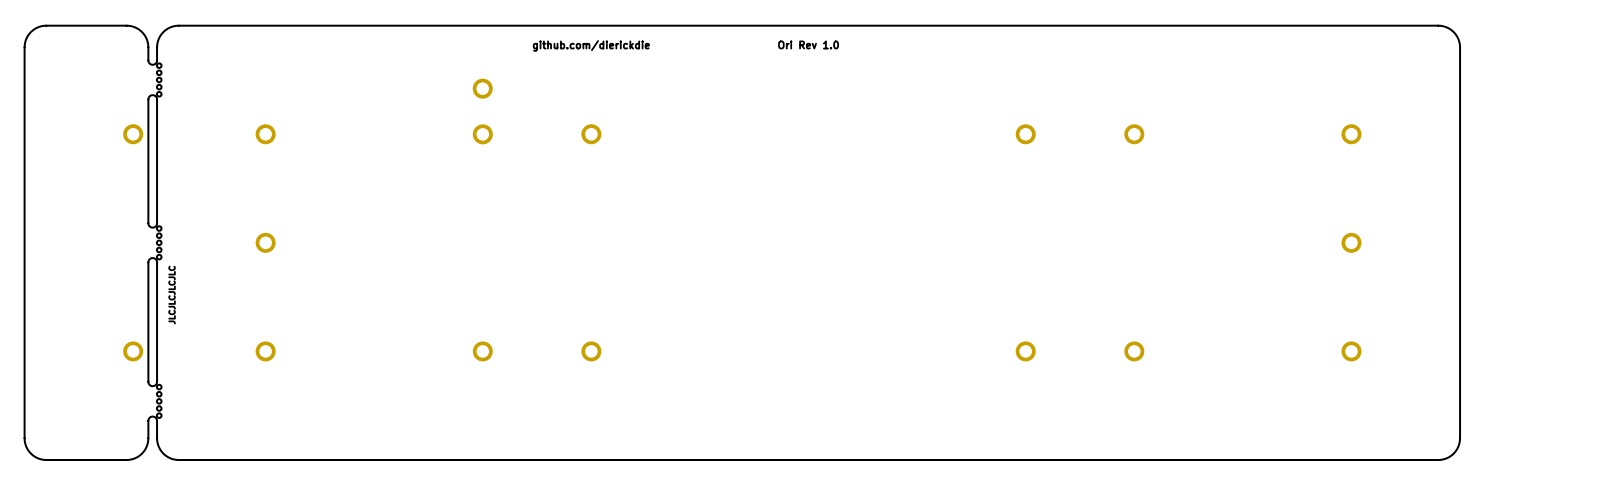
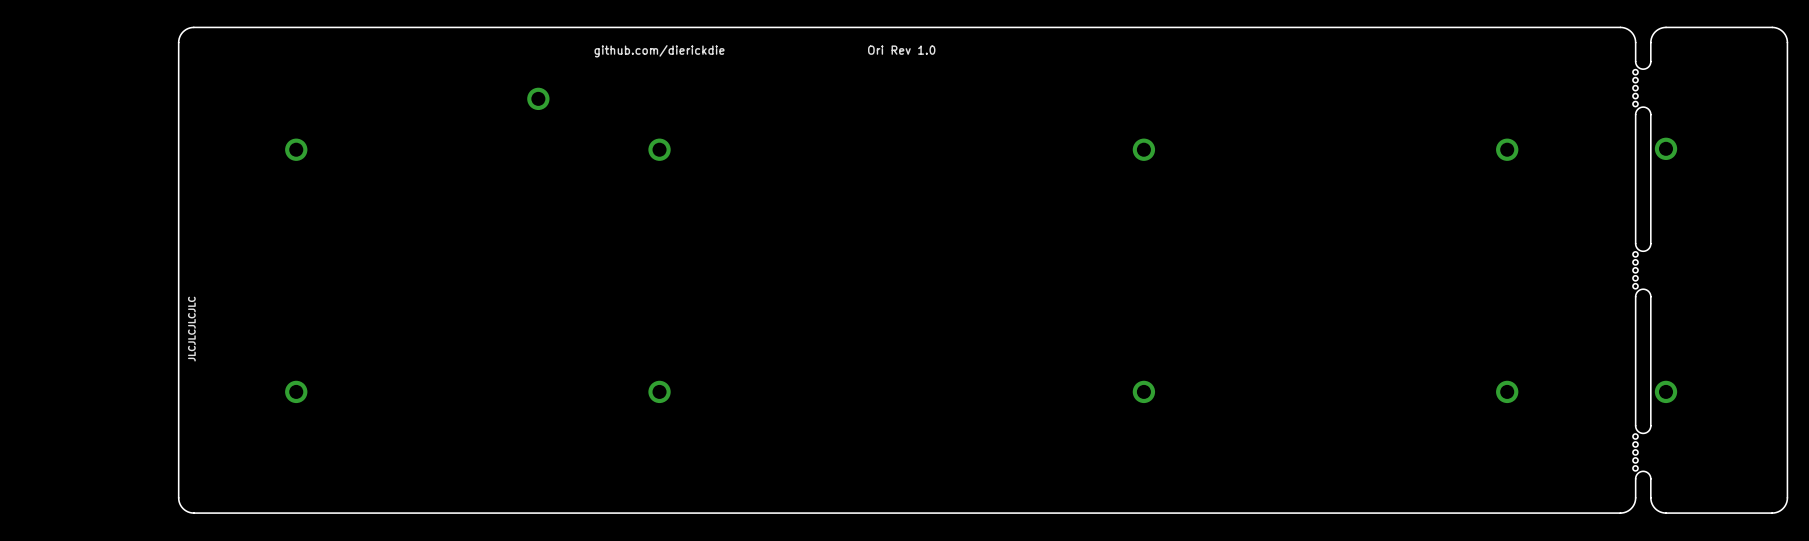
board edge: (46, 25) (134, 27) (142, 32) (146, 39) (148, 61) (152, 64) (156, 61) (157, 44) (159, 36) (167, 28) (178, 25) (1443, 26) (1455, 34) (1460, 47) (1459, 443) (1451, 455) (1438, 460) (178, 460) (167, 457) (159, 449) (157, 441) (156, 419) (152, 416) (148, 419) (146, 446) (142, 453) (134, 458) (126, 460) (40, 459) (29, 451) (24, 438) (24, 47) (26, 39) (30, 32) (37, 27) (46, 25) -> (193, 27) (183, 31) (178, 42) (178, 497) (181, 507) (189, 512) (1620, 513) (1628, 511) (1633, 505) (1635, 476) (1638, 472) (1643, 471) (1647, 472) (1650, 476) (1651, 503) (1655, 508) (1662, 512) (1774, 512) (1782, 508) (1786, 501) (1787, 42) (1784, 33) (1776, 27) (1662, 27) (1655, 31) (1651, 36) (1650, 63) (1647, 67) (1643, 69) (1638, 67) (1635, 63) (1633, 35) (1628, 29) (1620, 27) (193, 27)
part: (159, 79) -> none
part: none -> (1635, 88)
board edge: (148, 99) (148, 223) (152, 227) (157, 223) (157, 99) (152, 95) (149, 96) (148, 97) (148, 99) -> none
board edge: none -> (1635, 114) (1635, 243) (1637, 249) (1643, 251) (1648, 249) (1650, 243) (1650, 114) (1648, 109) (1643, 107) (1637, 109) (1635, 114)
part: none -> (1666, 148)
part: (133, 134) -> none
part: (482, 134) -> none
part: (1134, 134) -> none
part: (159, 242) -> none
part: (265, 242) -> none
part: (1351, 242) -> none
part: none -> (1635, 270)
board edge: (148, 262) (148, 381) (152, 386) (157, 381) (157, 262) (152, 258) (149, 259) (148, 260) (148, 262) -> none
board edge: none -> (1635, 296) (1635, 425) (1637, 431) (1643, 433) (1648, 431) (1650, 425) (1650, 296) (1648, 291) (1643, 289) (1637, 291) (1635, 296)
part: (133, 351) -> none
part: (482, 351) -> none
part: (1134, 351) -> none
part: none -> (1666, 391)
part: (159, 401) -> none
part: none -> (1635, 452)

